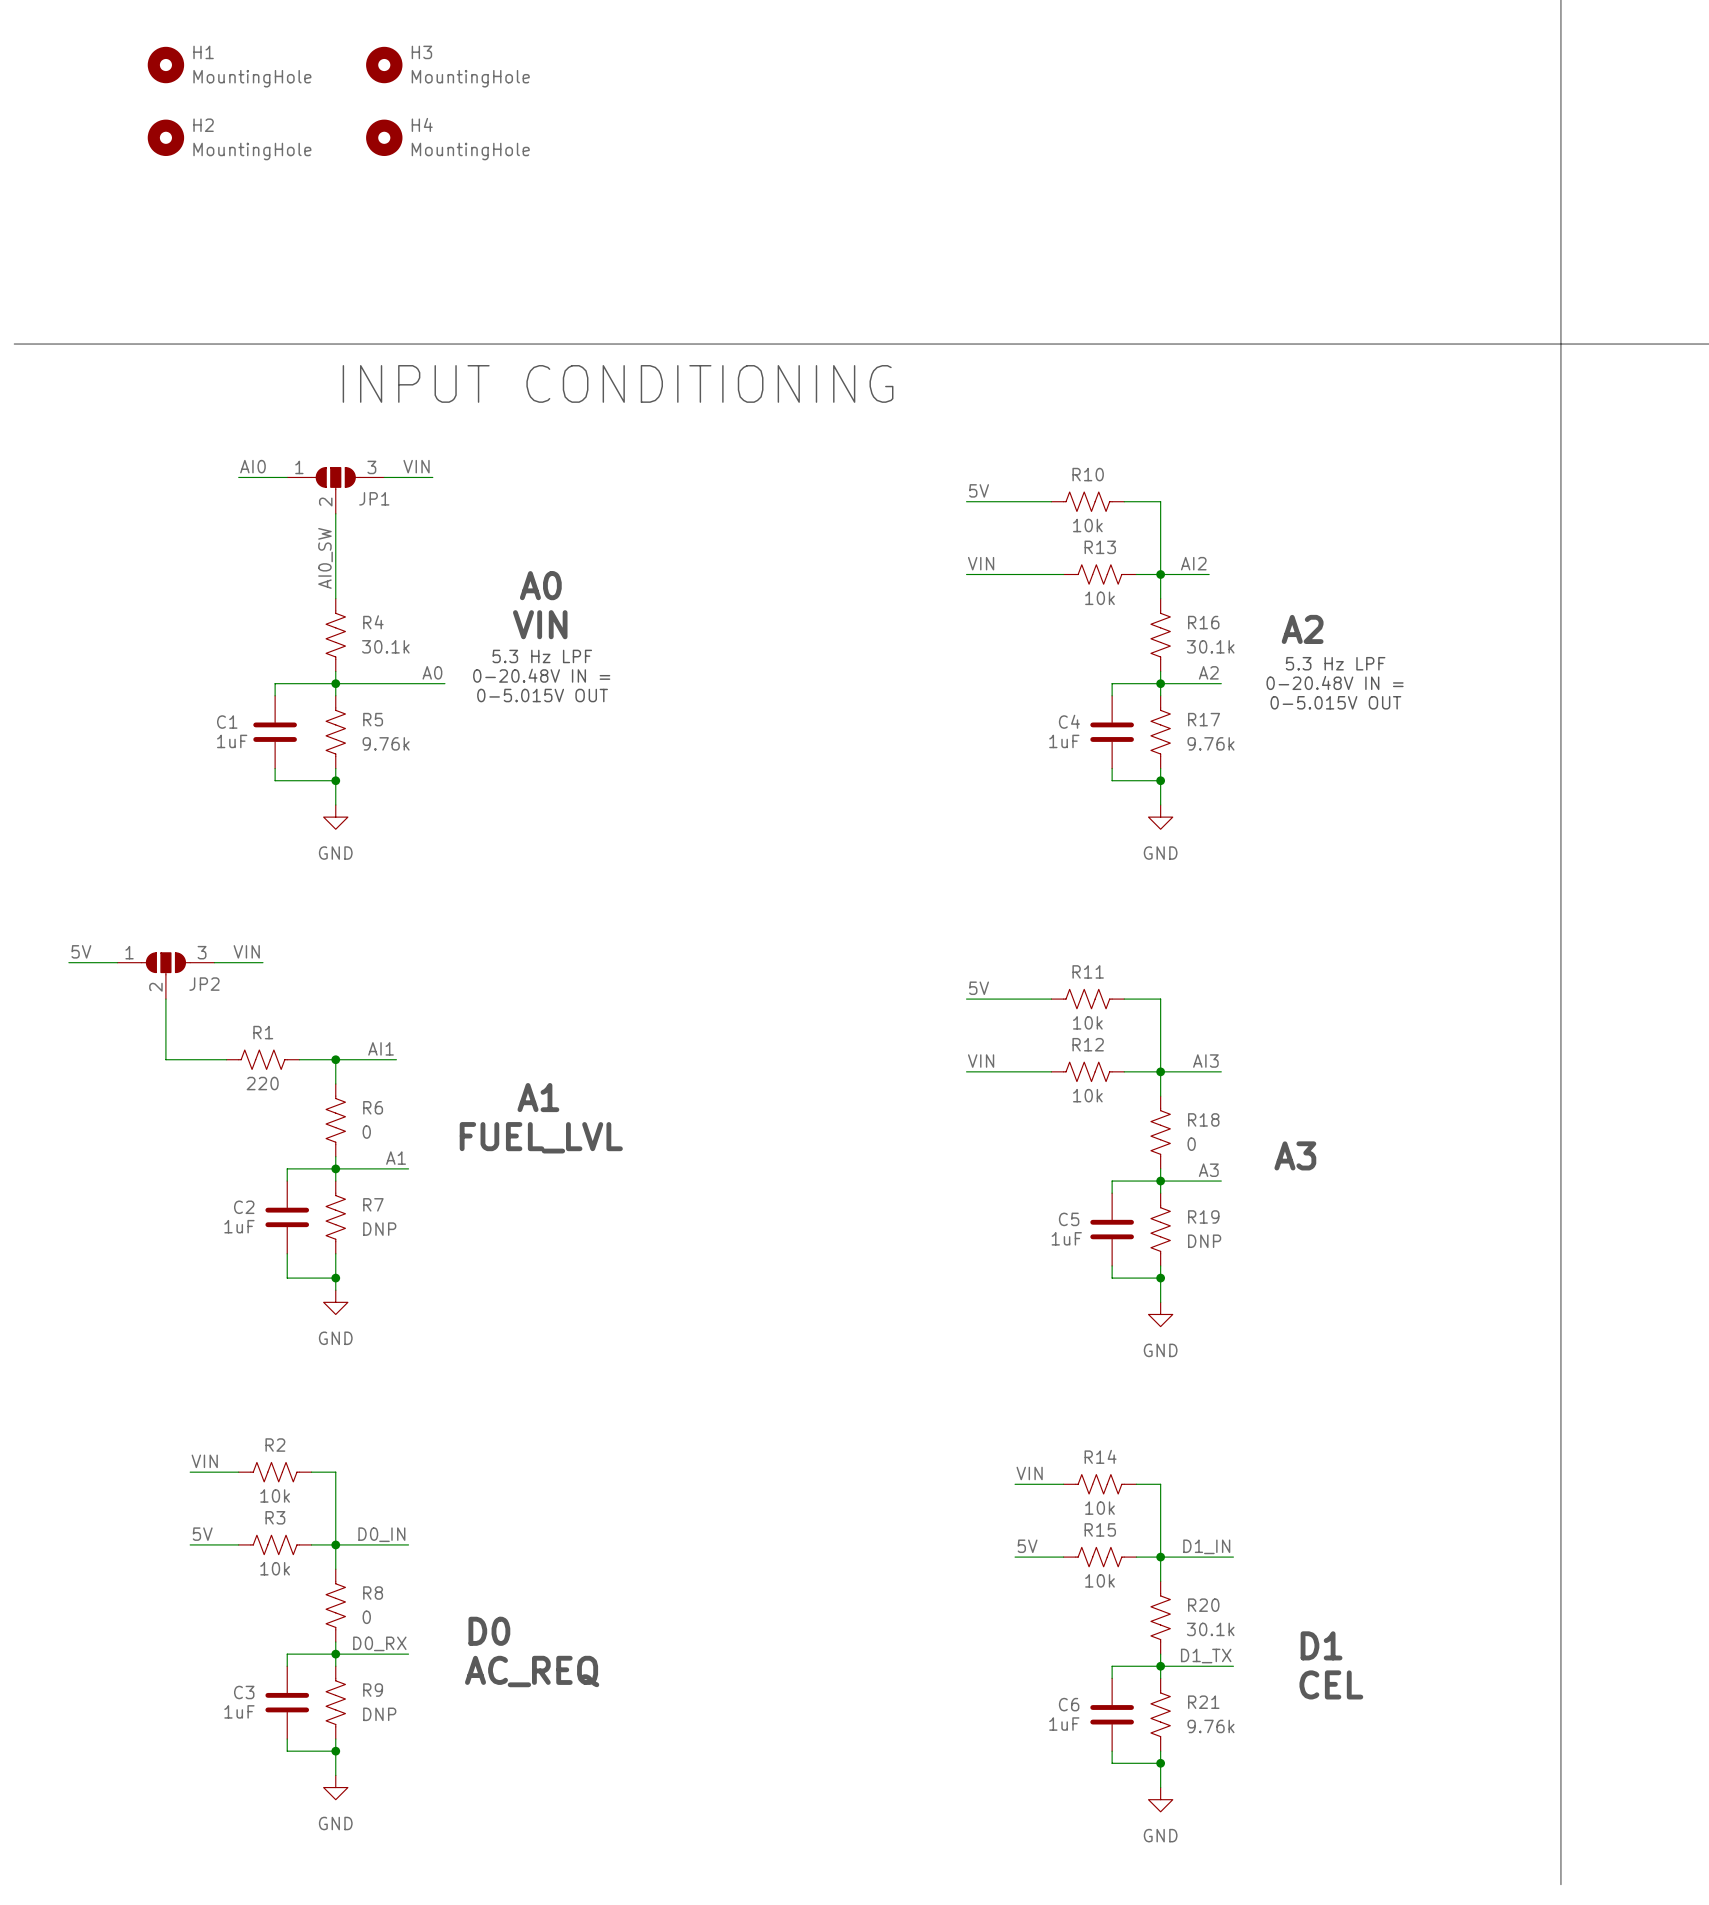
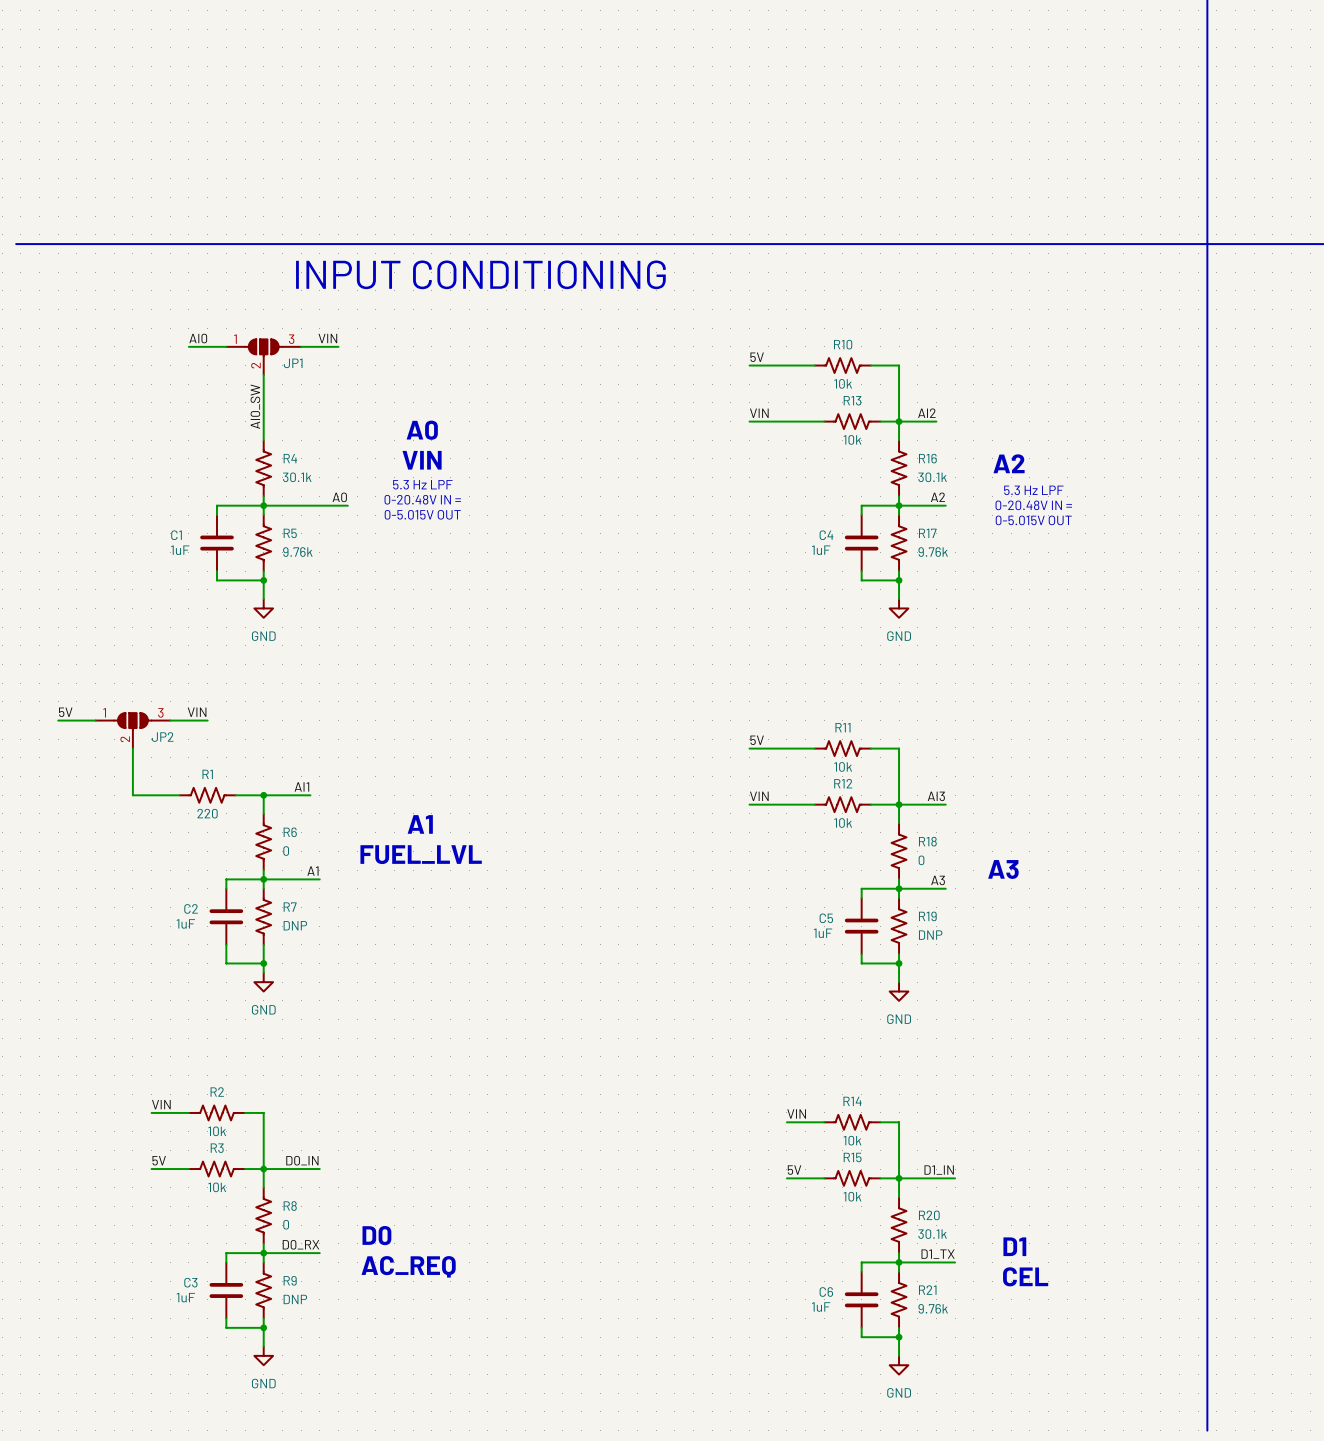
H1: MountingHole (165, 65) -> none
H3: MountingHole (384, 65) -> none
H2: MountingHole (165, 137) -> none
H4: MountingHole (384, 137) -> none

